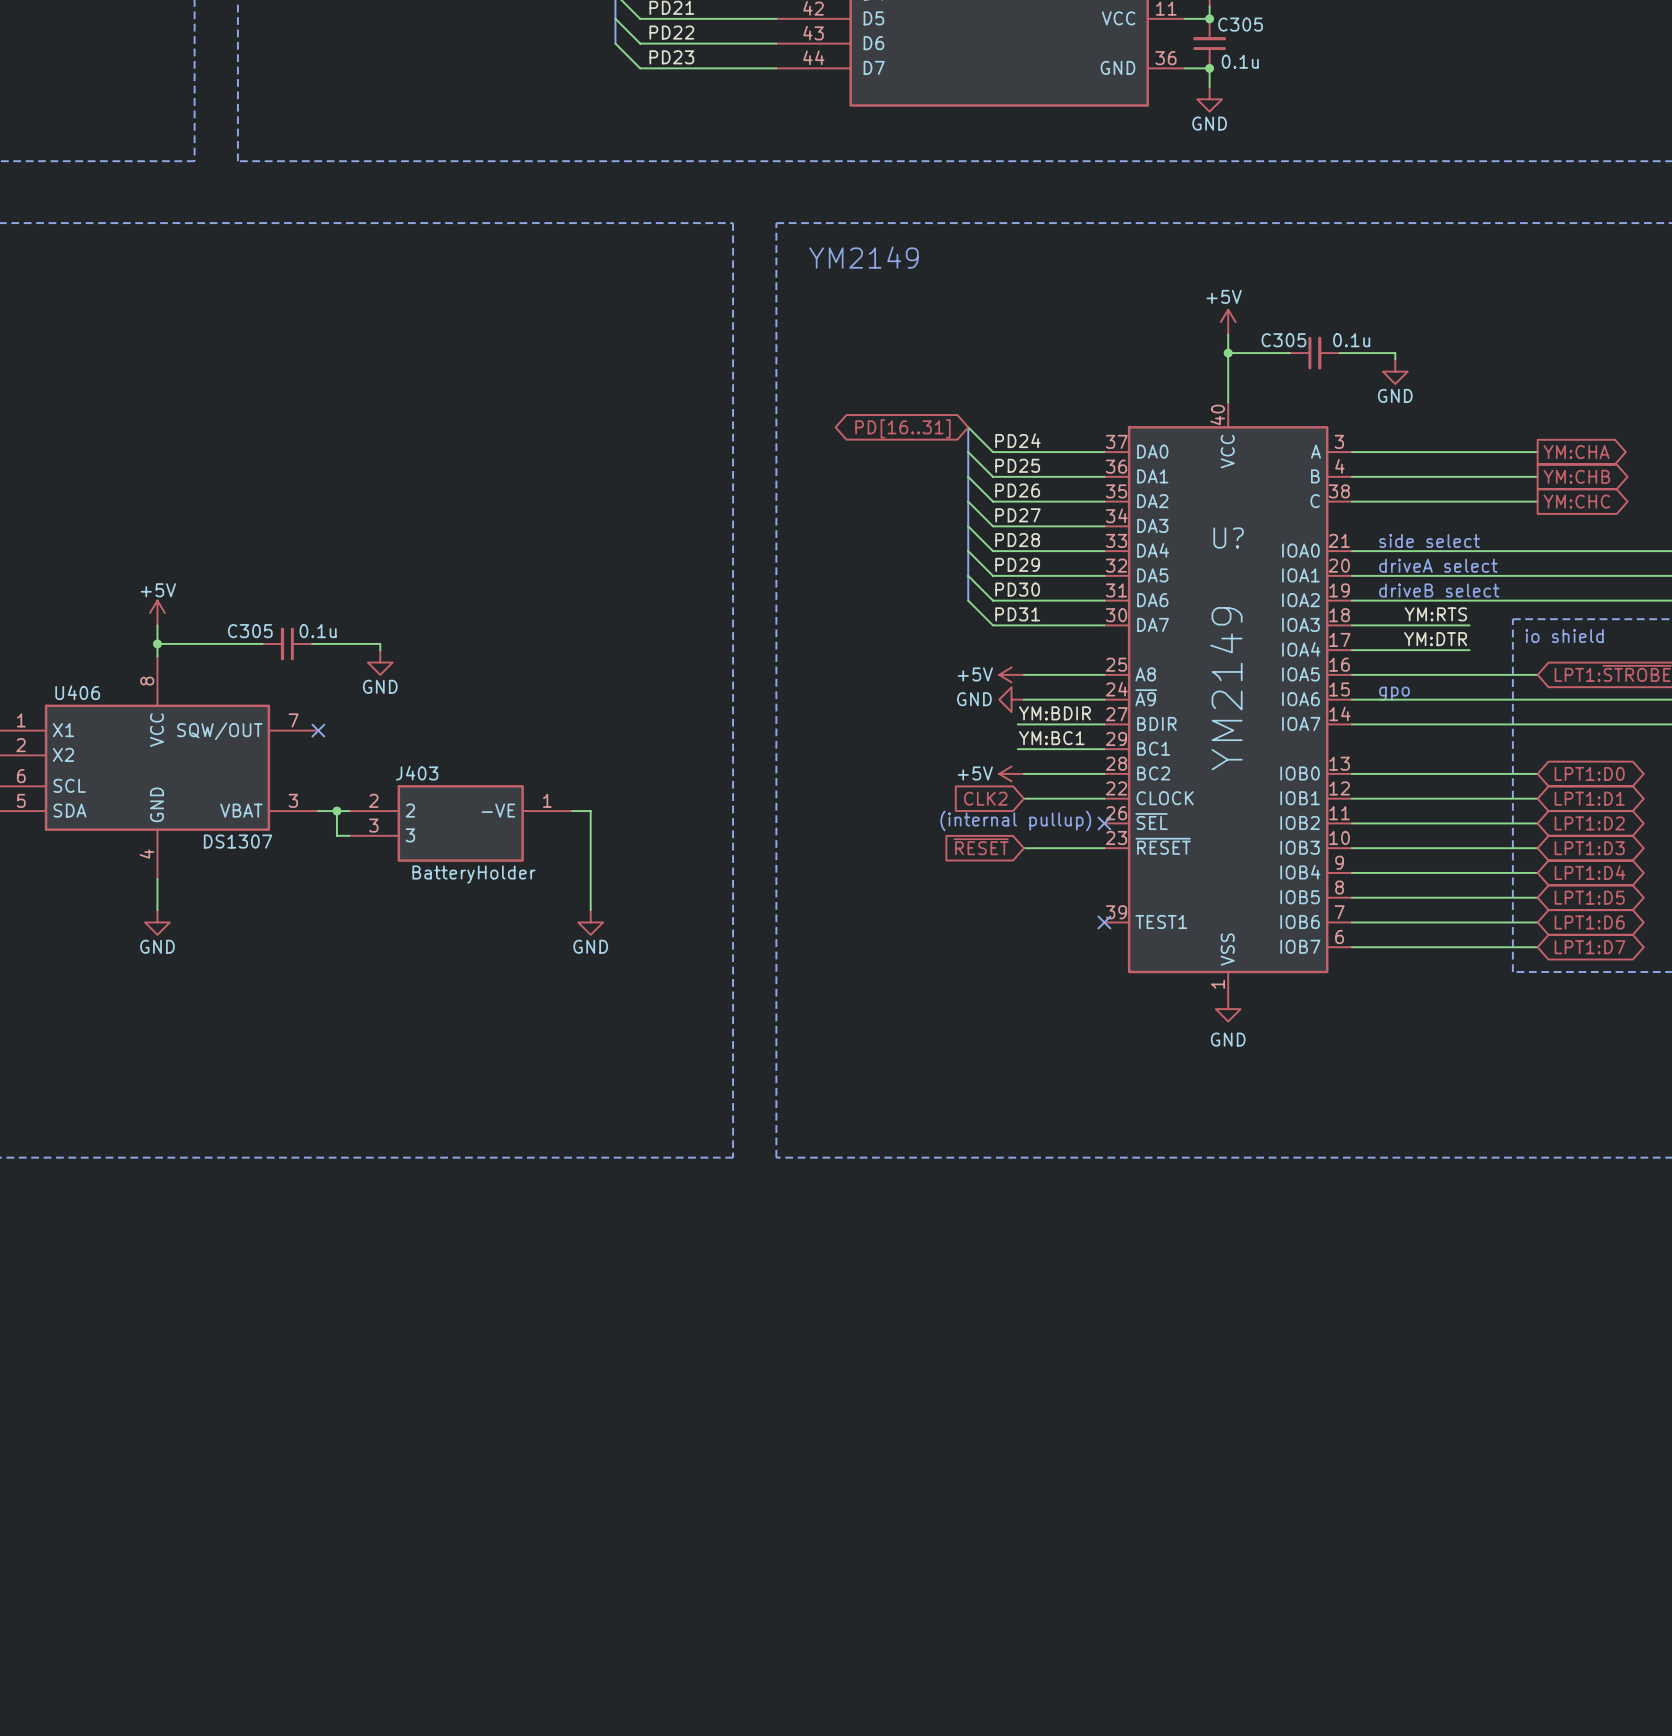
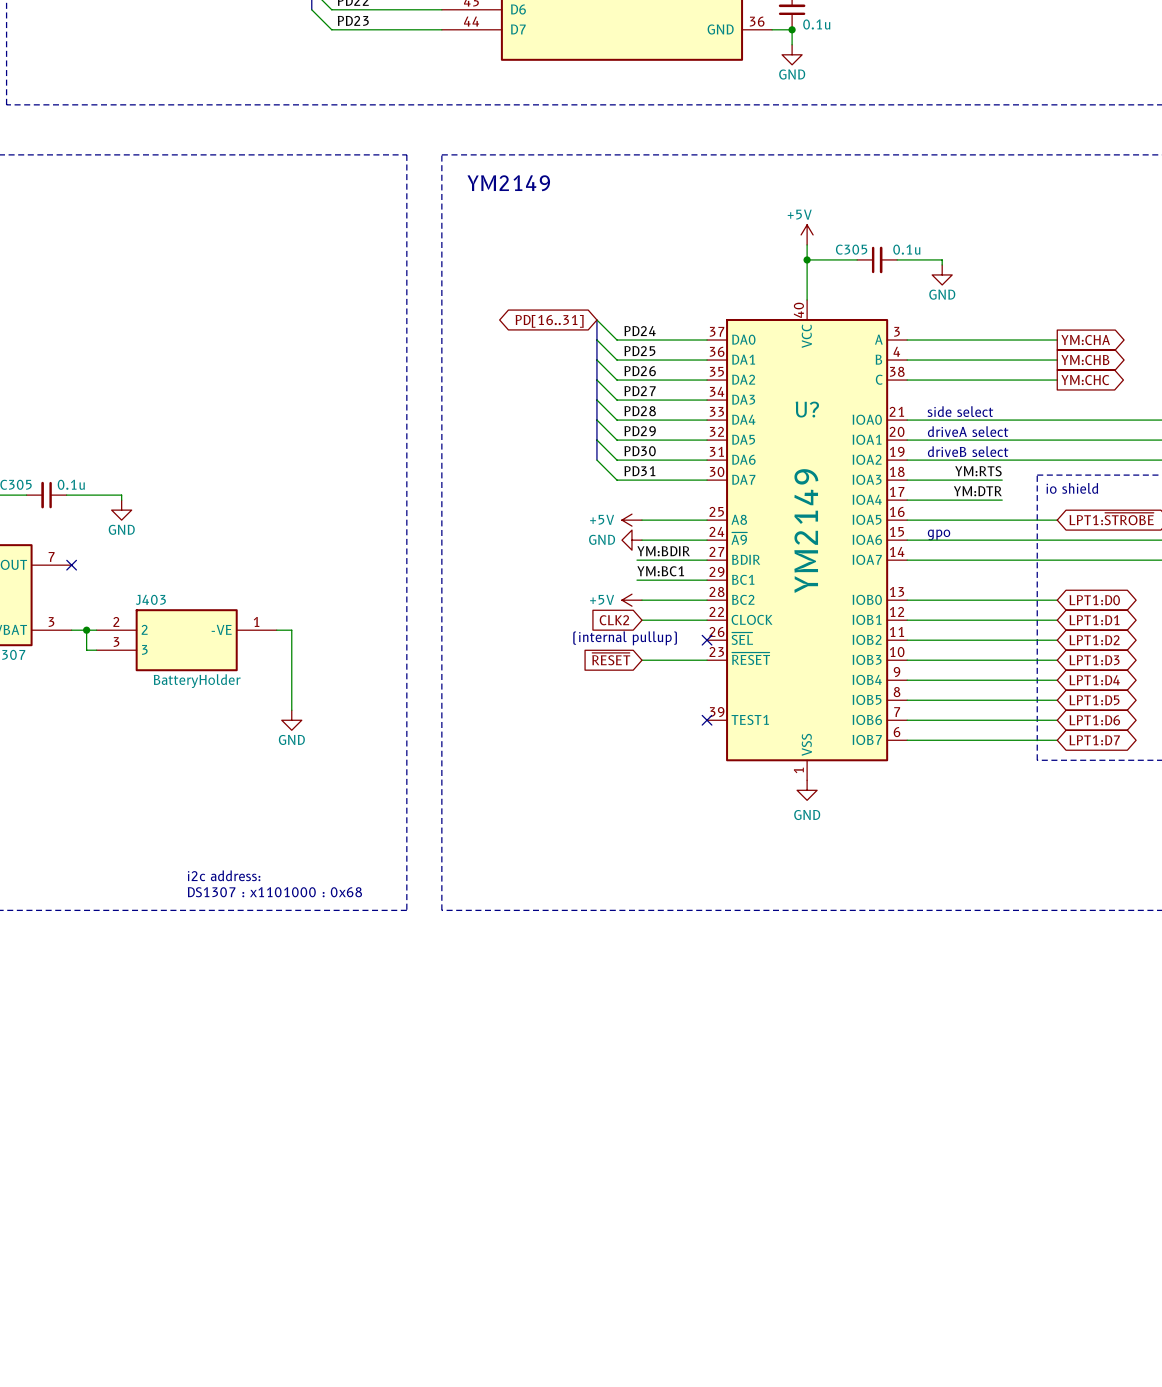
text: none -> i2c address: (224, 875)
text: none -> DS1307 : x1101000 : 0x68 (274, 892)

